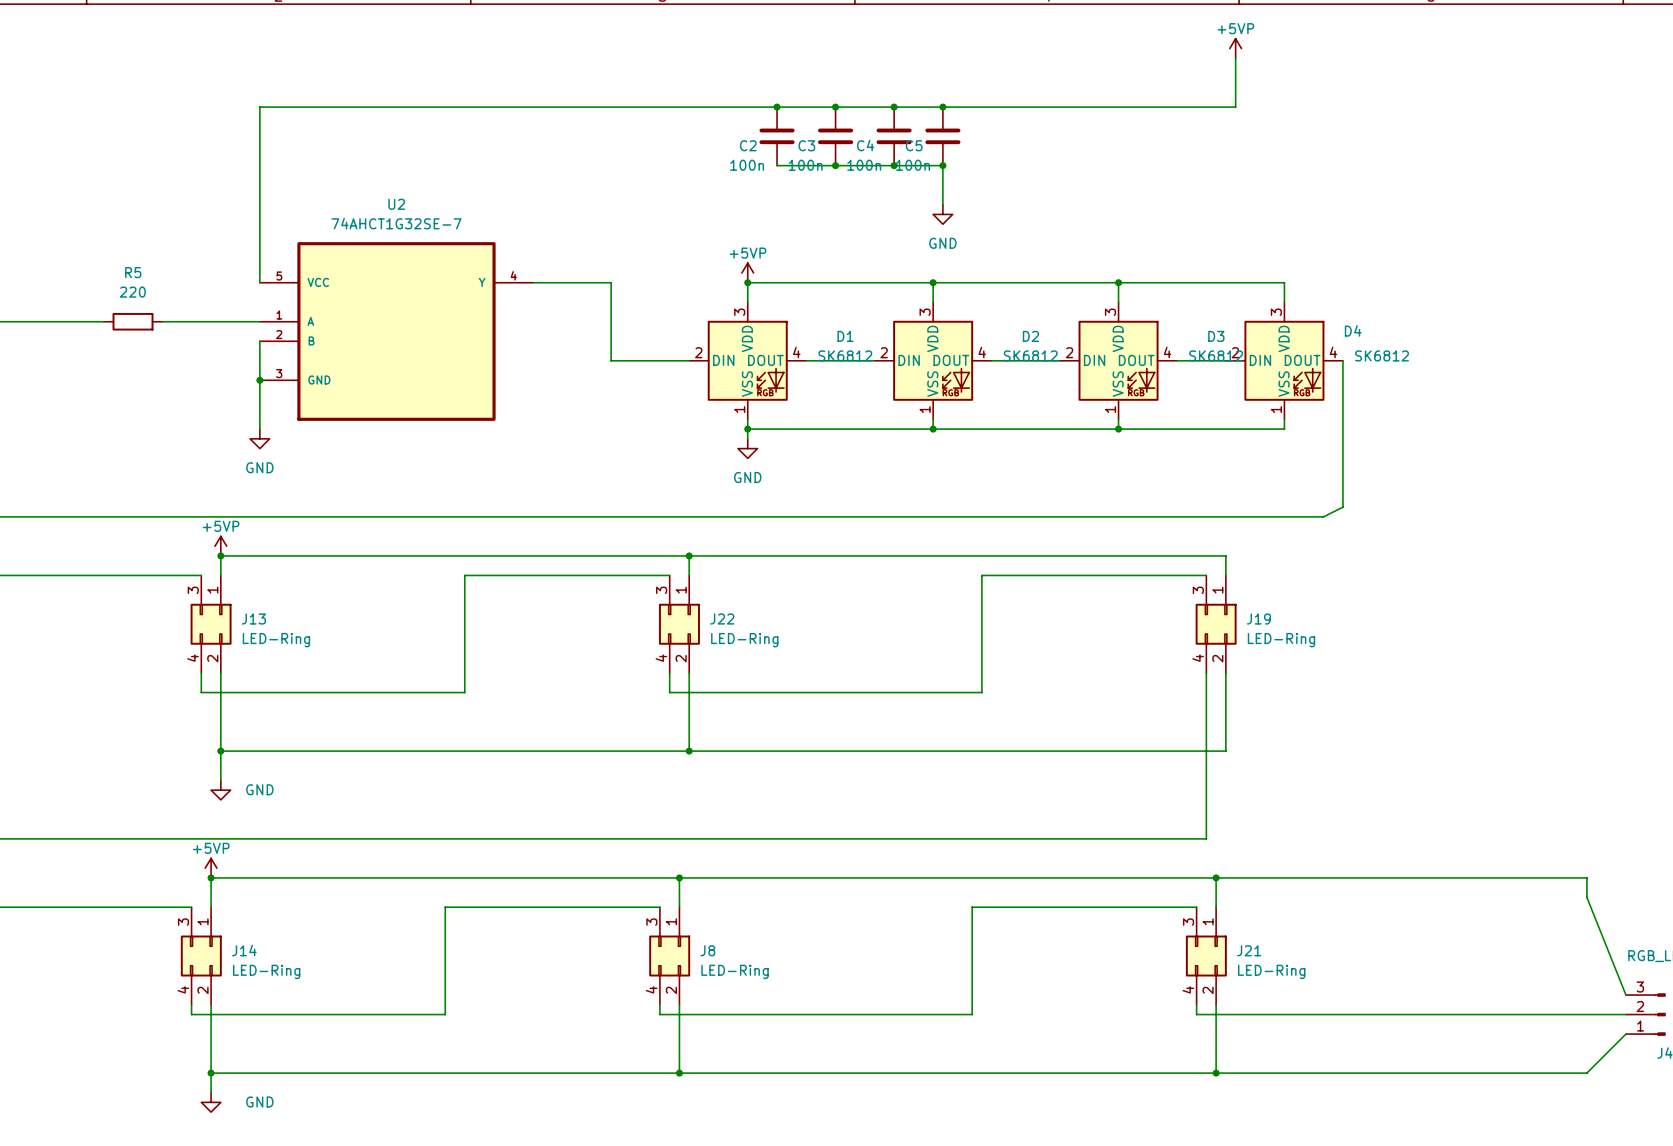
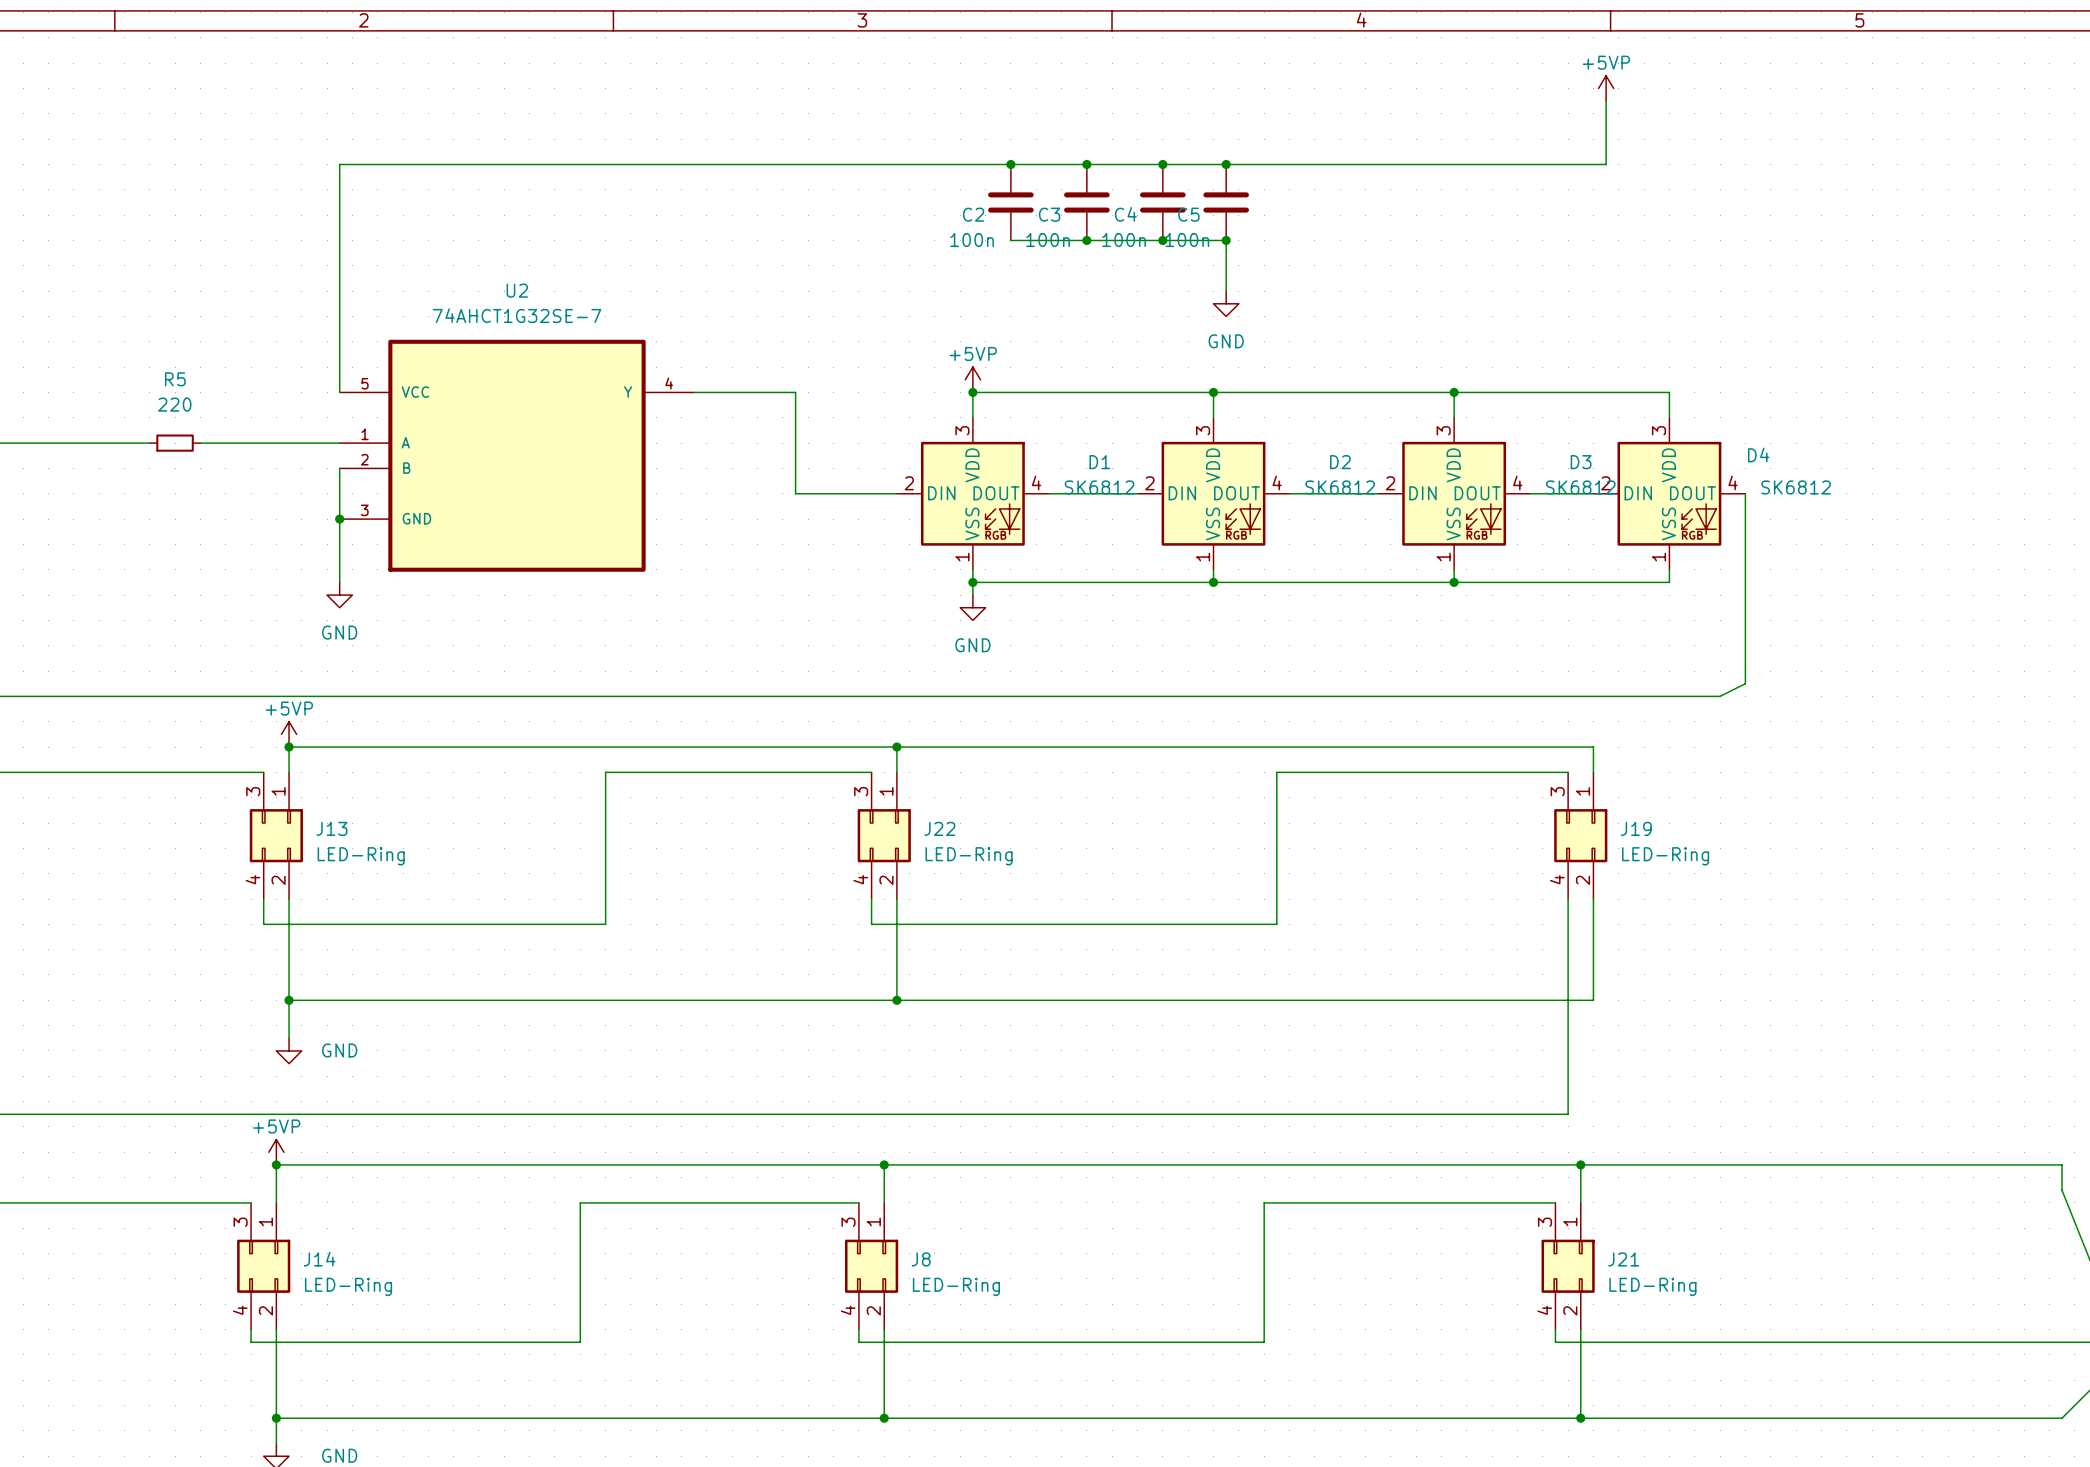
R5 symbol: [103, 312, 163, 331] -> [149, 434, 201, 452]

